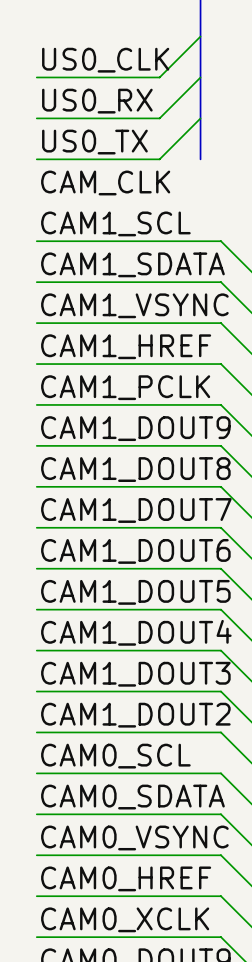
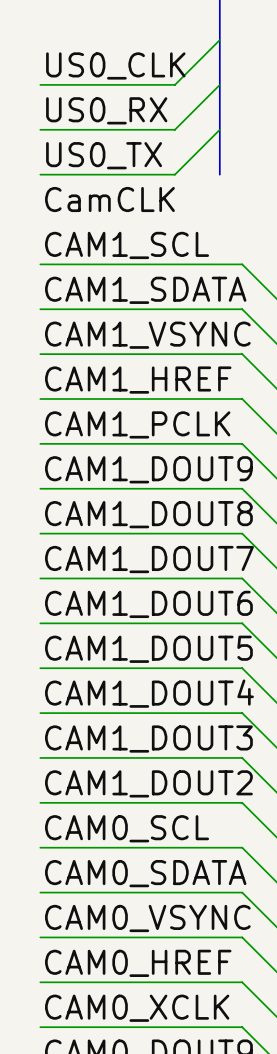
label: CAM_CLK (105, 182) -> CamCLK (109, 199)

